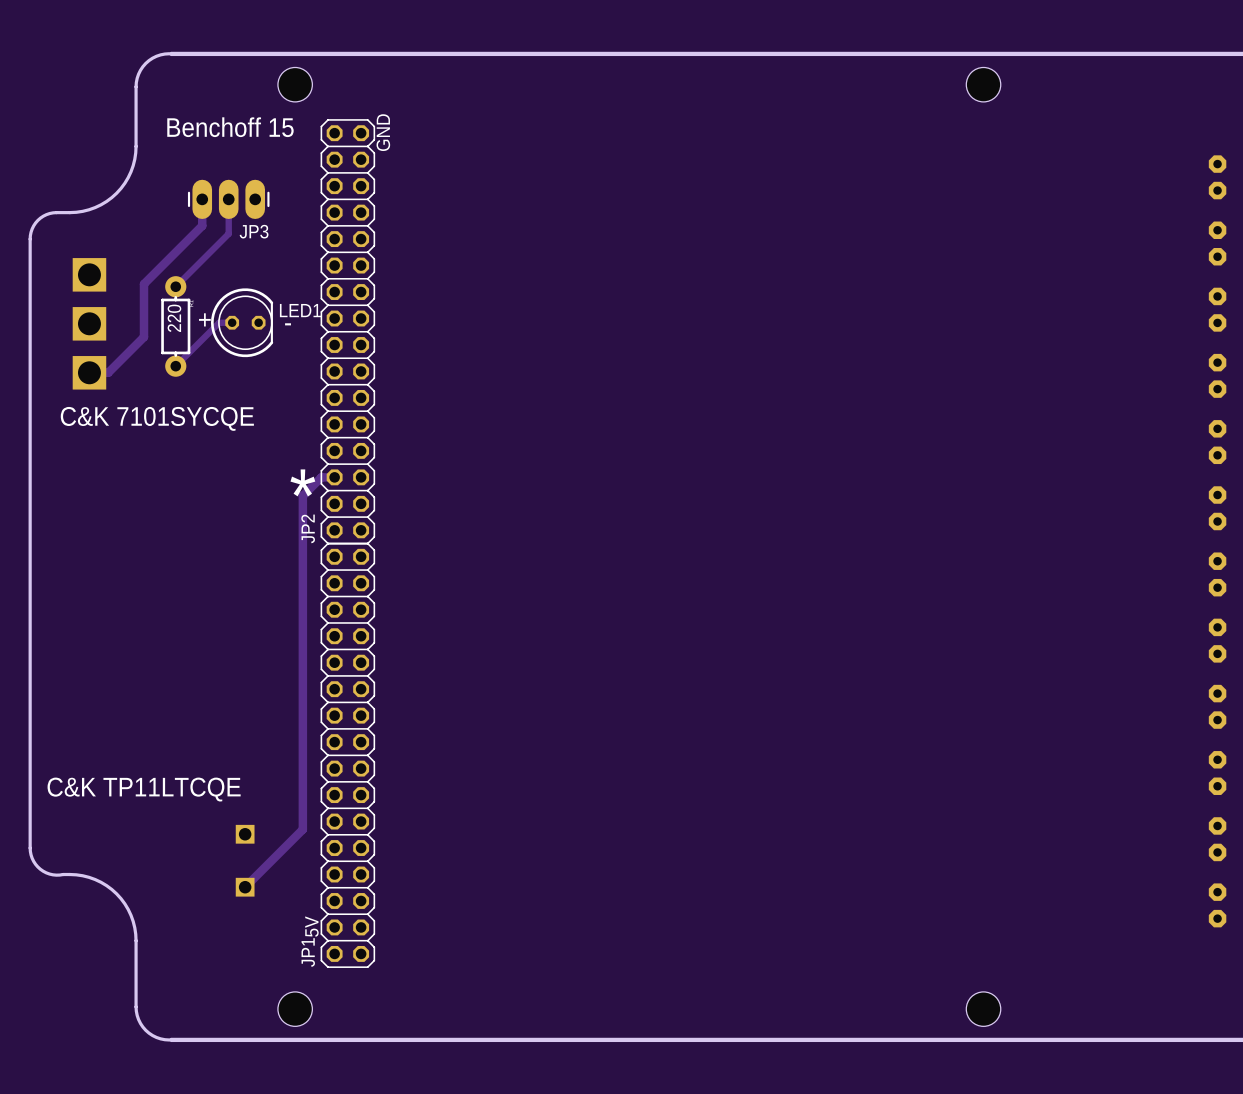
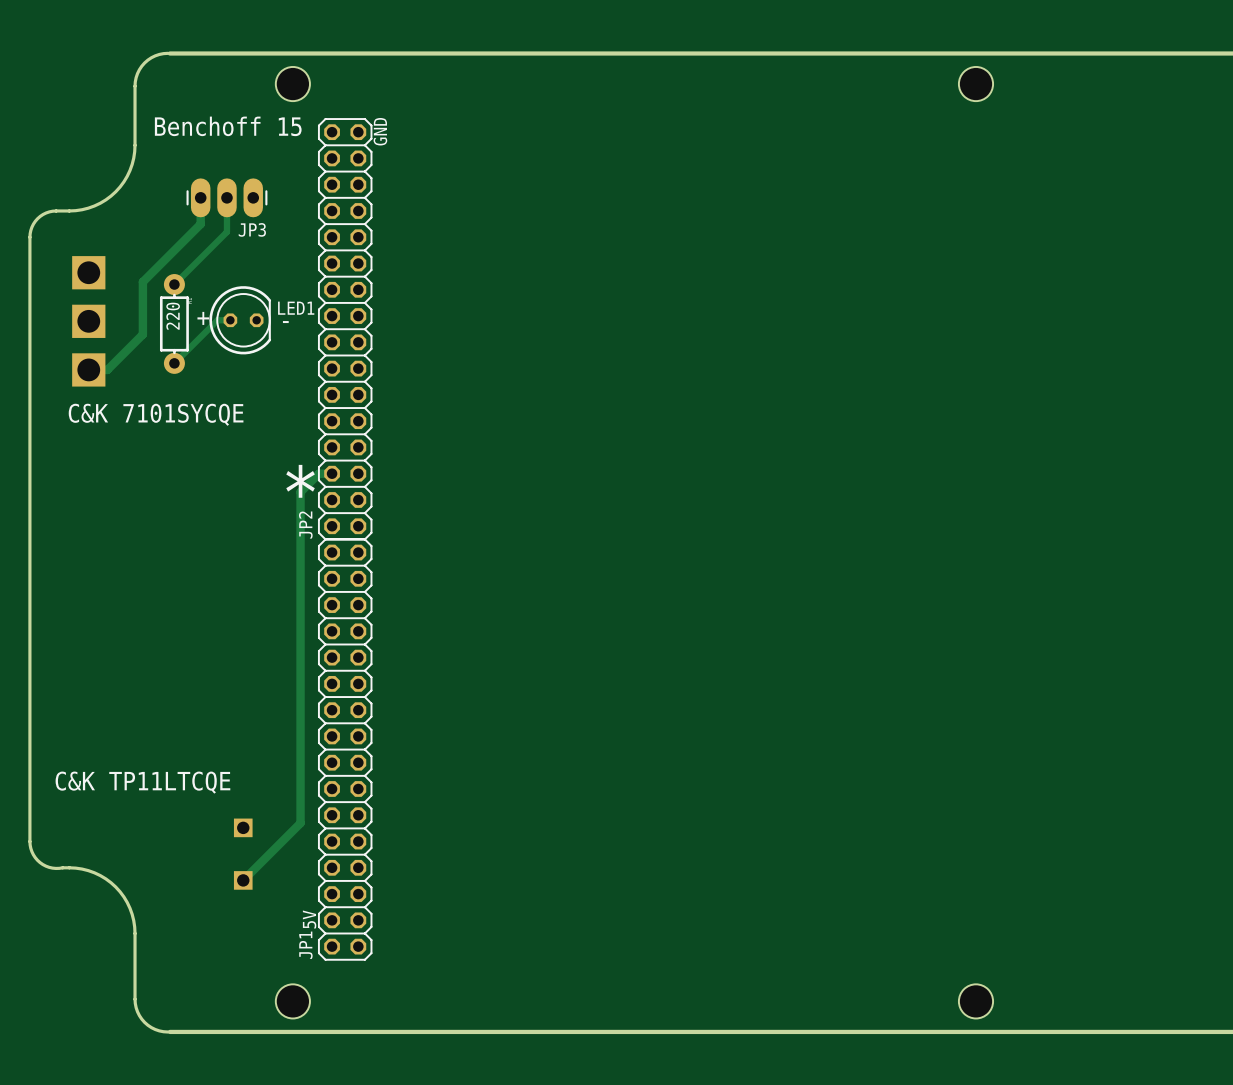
part: (1217, 177) -> none
part: (1217, 243) -> none
part: (1217, 309) -> none
part: (1217, 375) -> none
part: (1217, 442) -> none
part: (1217, 508) -> none
part: (1217, 574) -> none
part: (1217, 640) -> none
part: (1217, 706) -> none
part: (1217, 773) -> none
part: (1217, 839) -> none
part: (1217, 905) -> none

